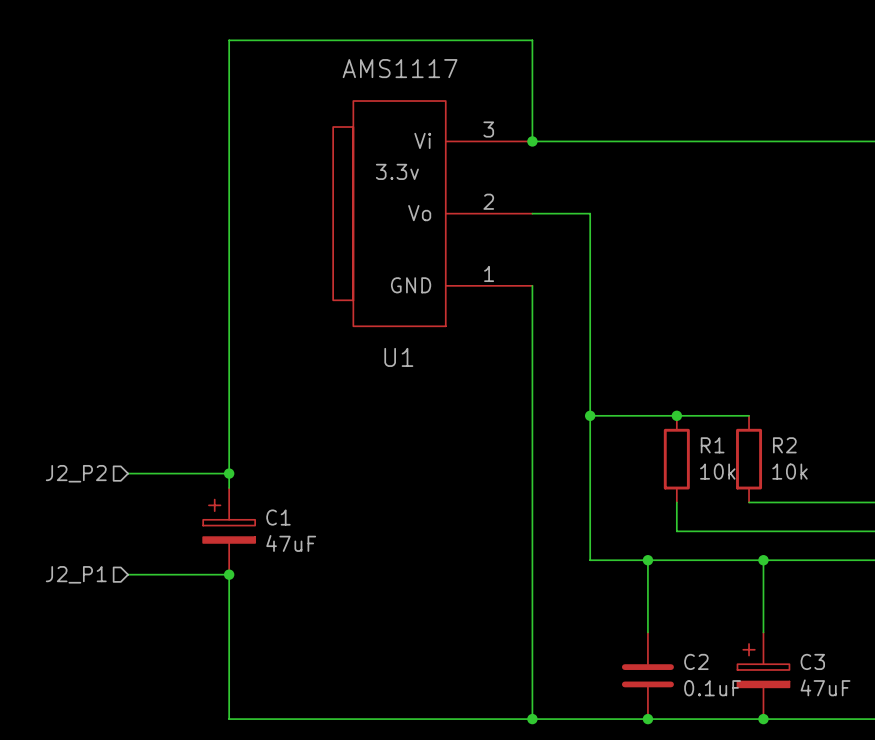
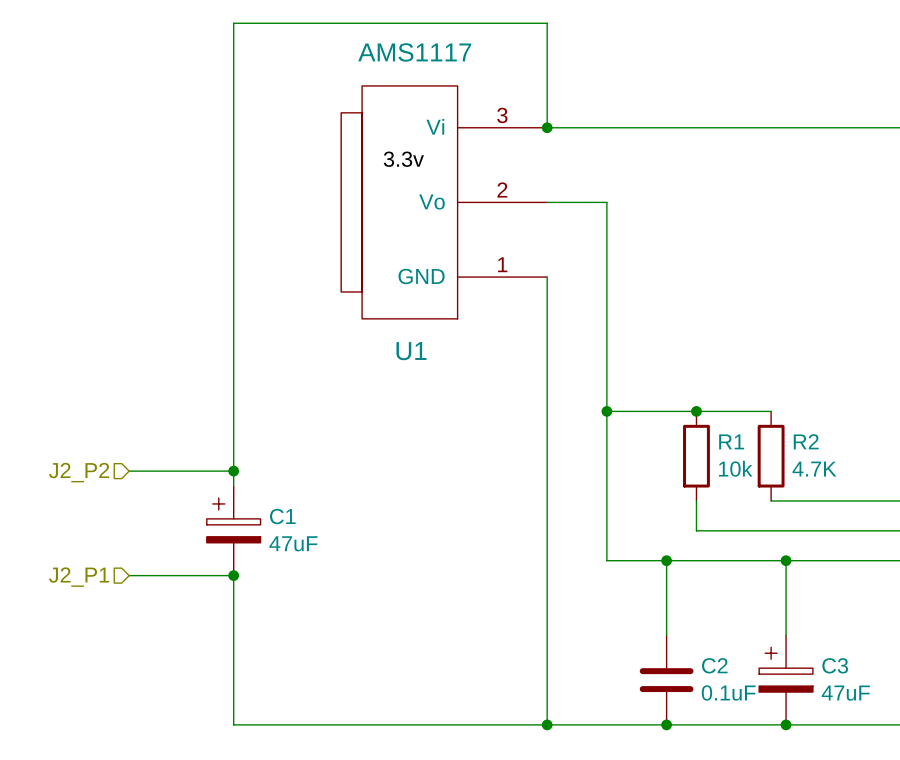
R2 value: 10k (789, 471) -> 4.7K (814, 469)

